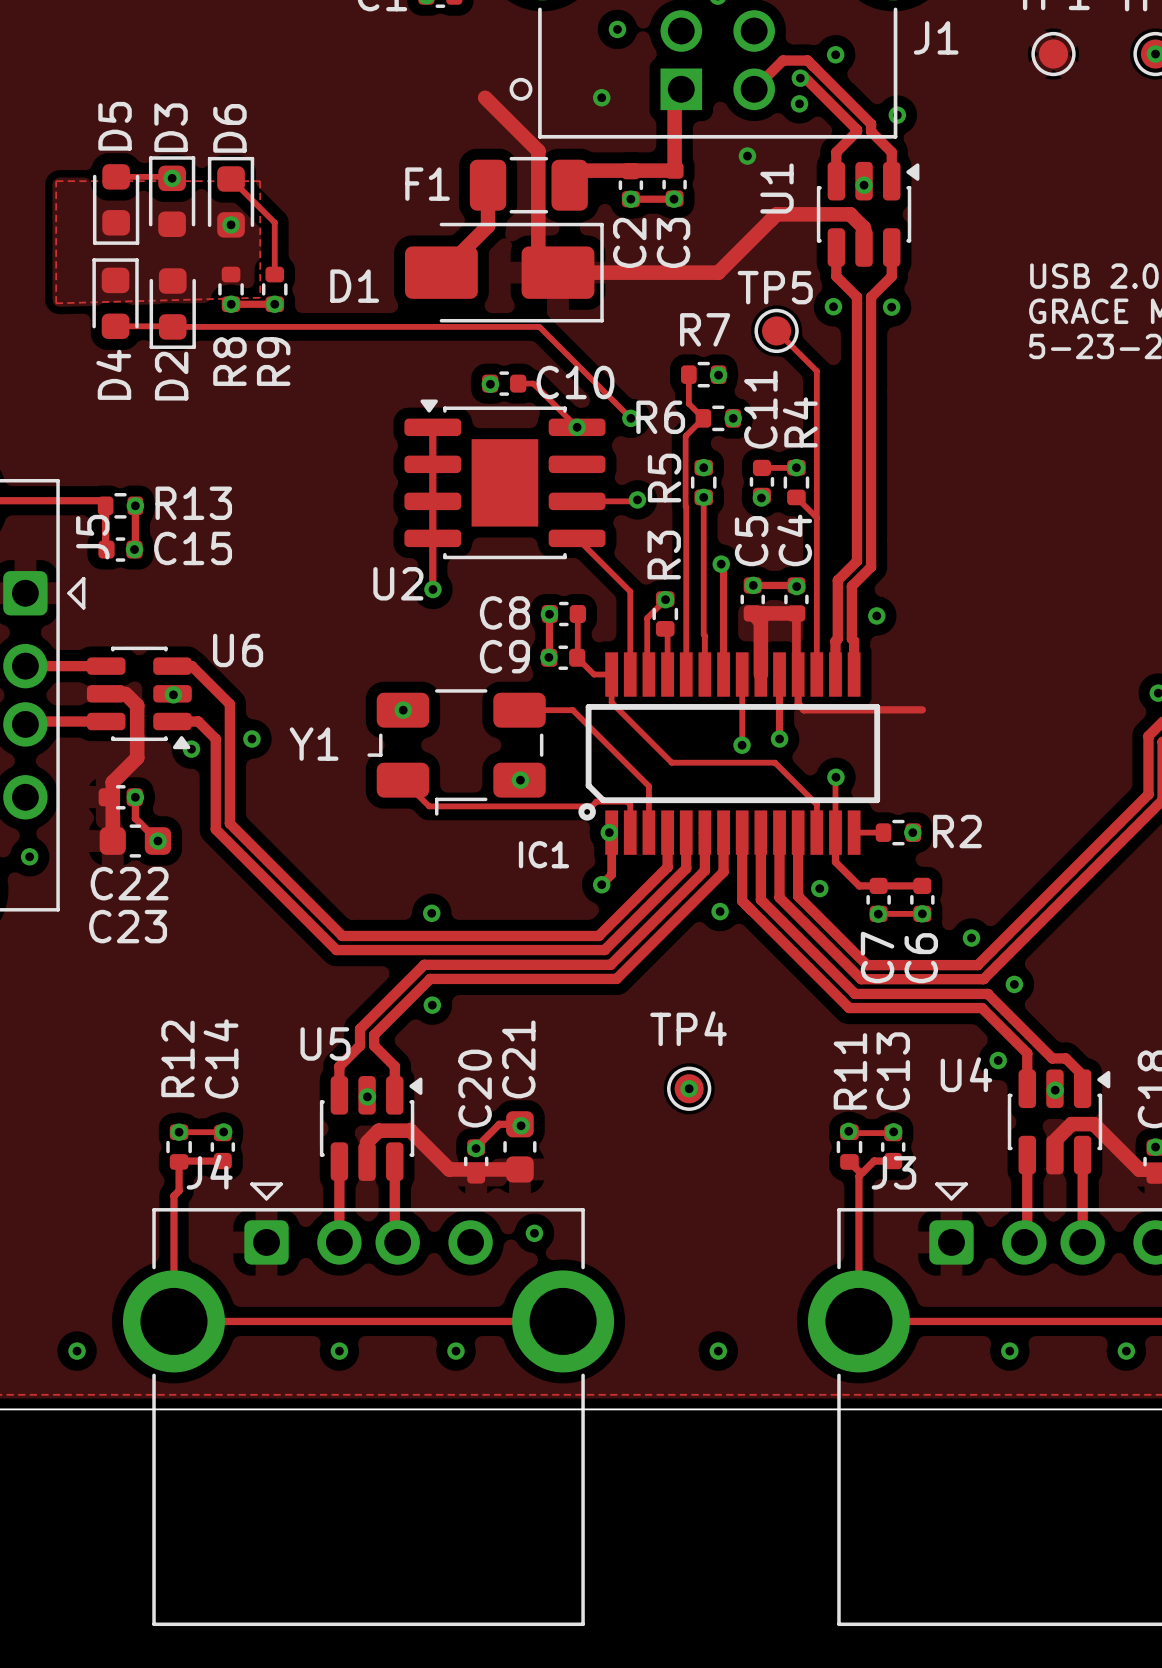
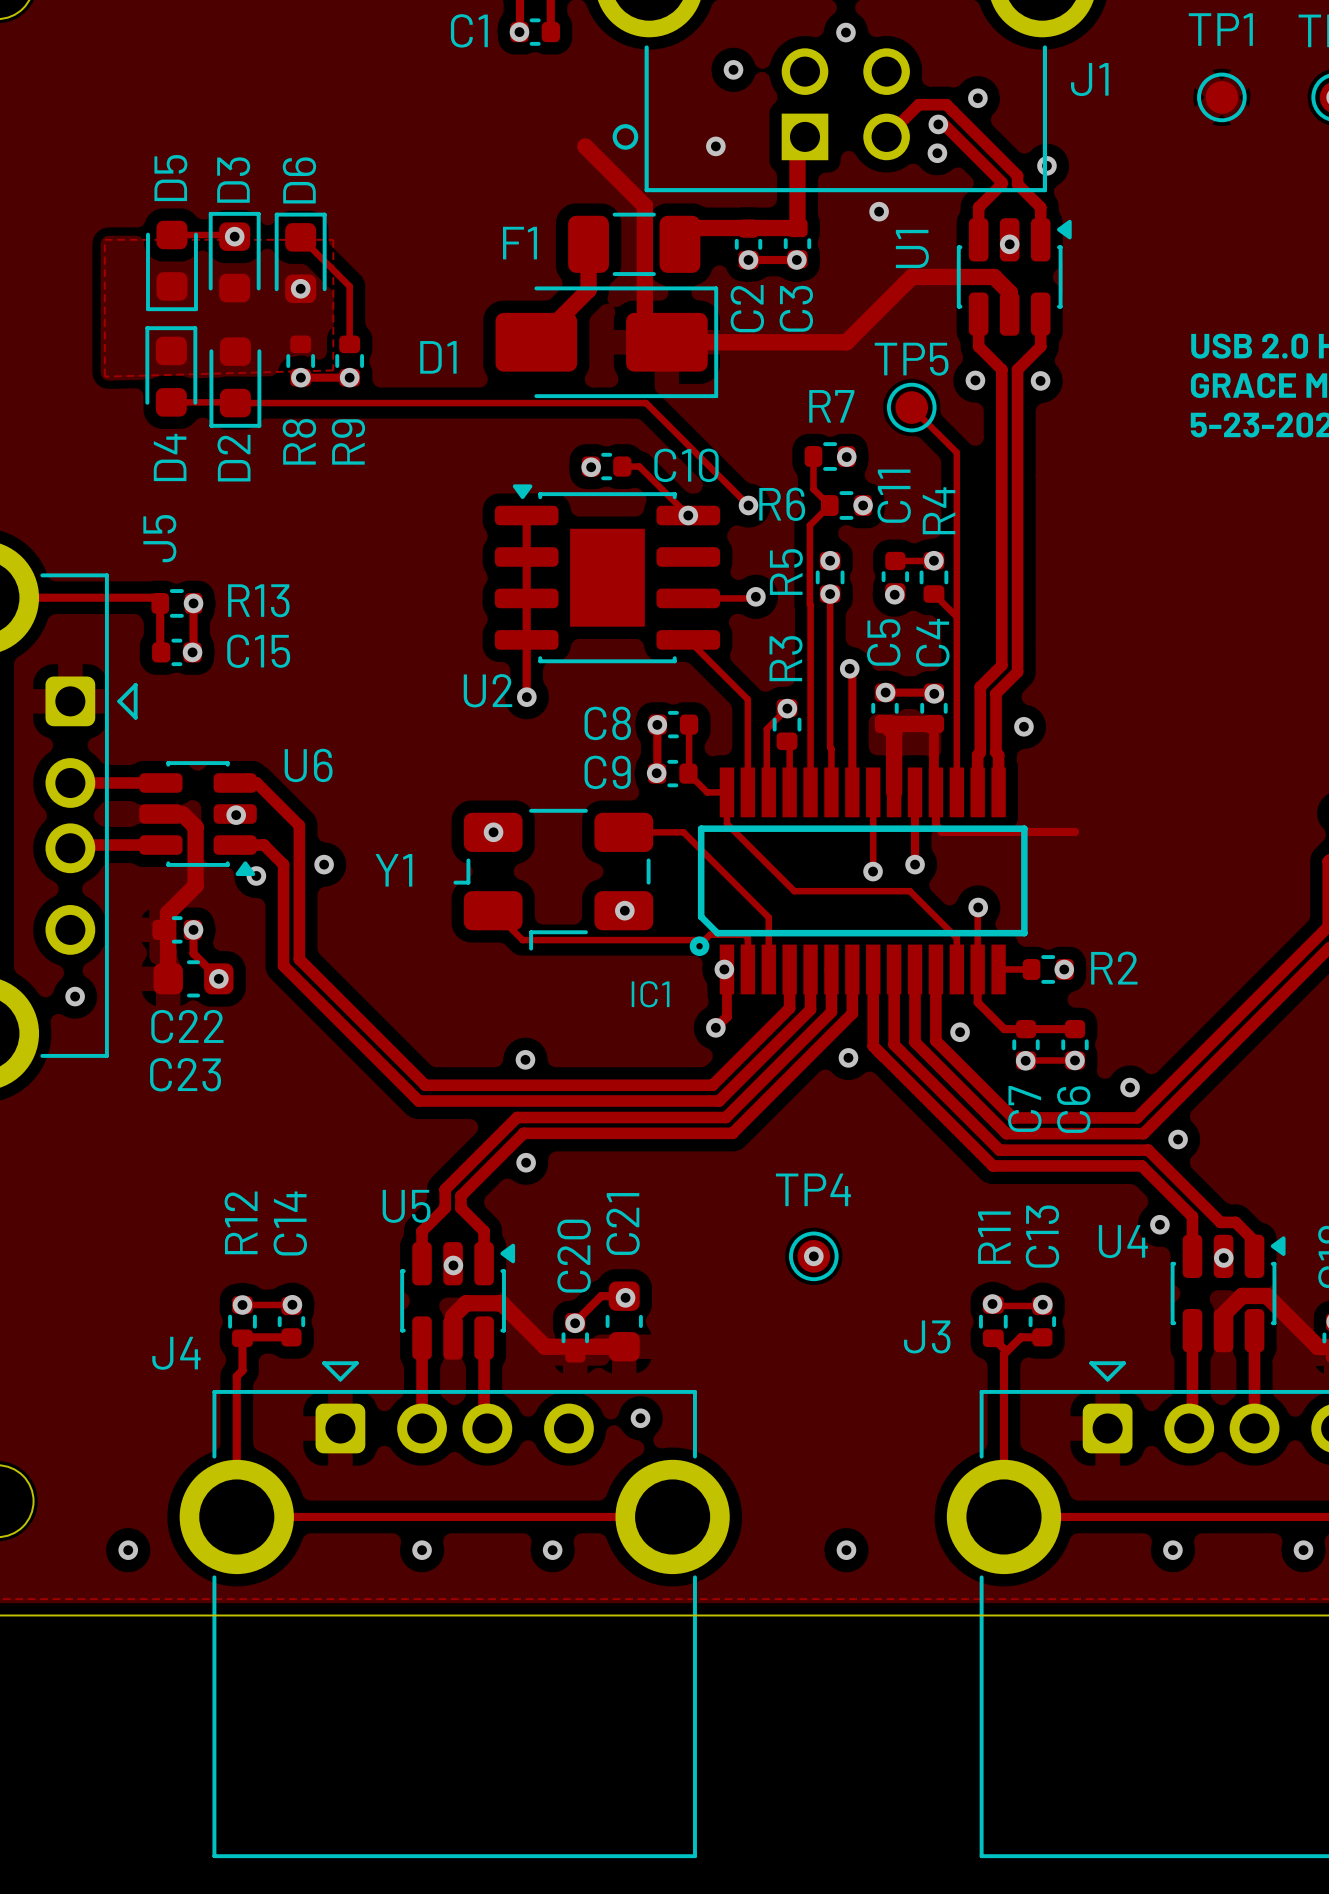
J5 name position: J5 (92, 537) -> J5 (159, 538)
J4 name position: J4 (209, 1172) -> J4 (176, 1353)
J3 name position: J3 (893, 1172) -> J3 (927, 1336)

